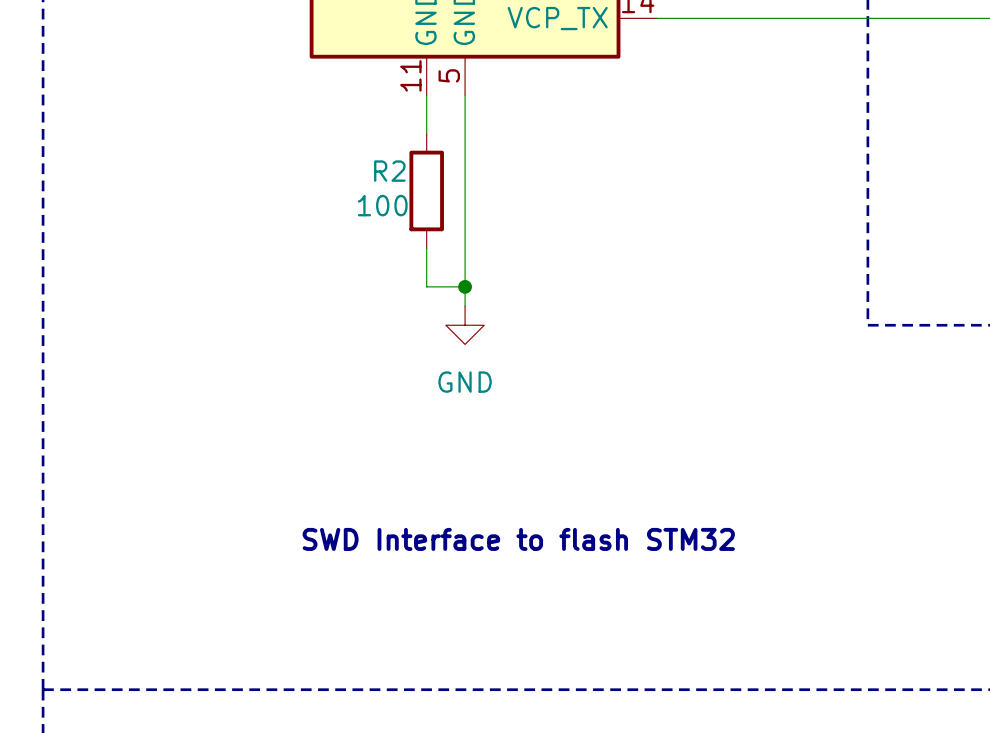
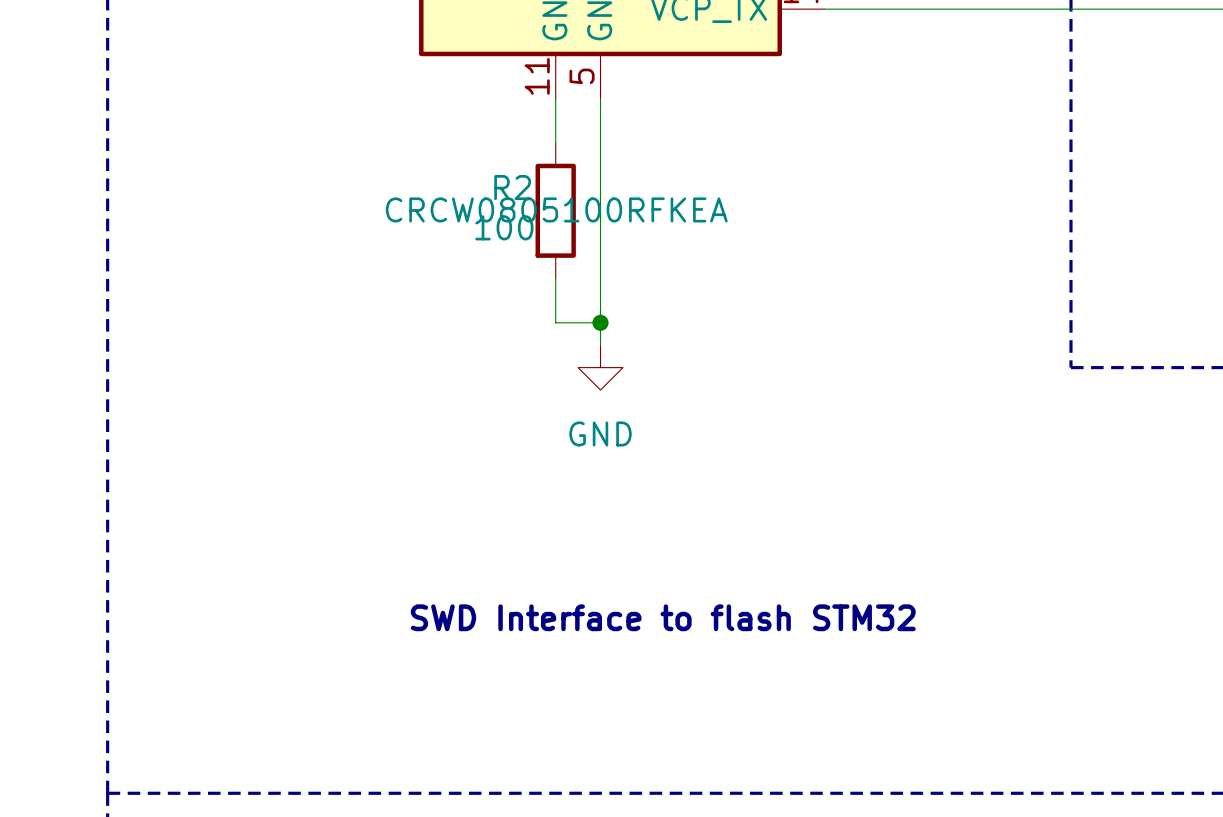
R2 text: none -> CRCW0805100RFKEA (556, 209)

